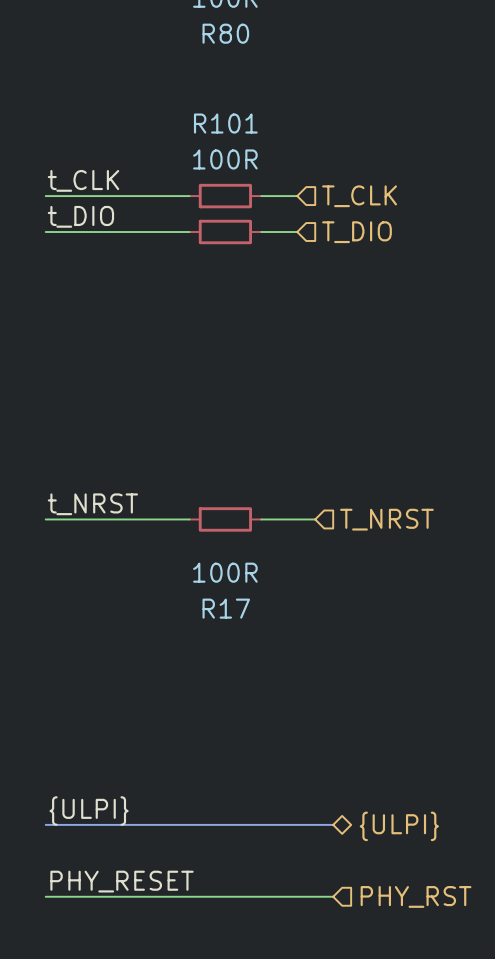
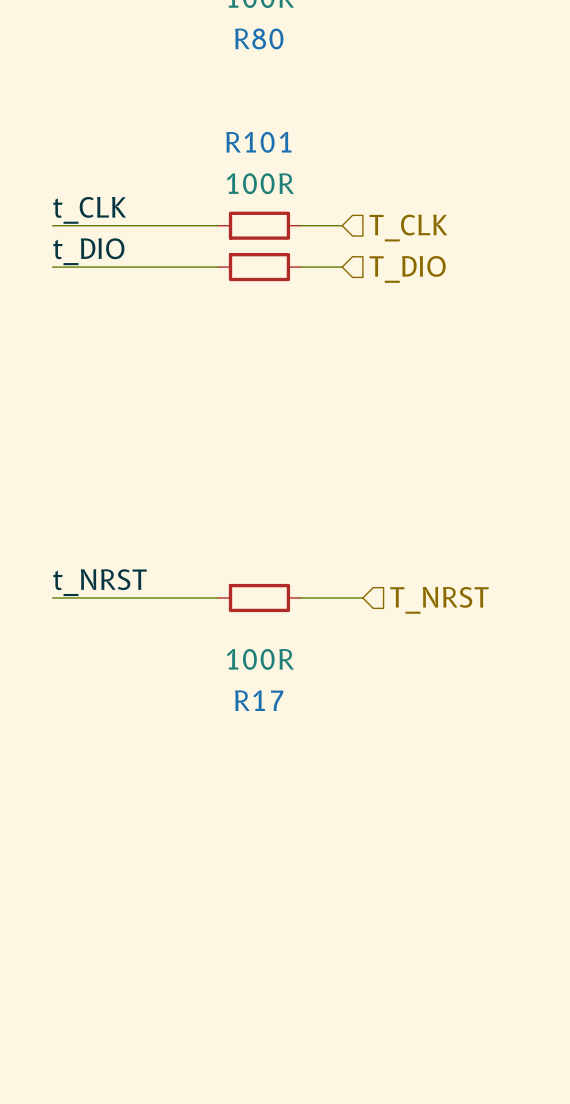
label: {ULPI} (89, 811) -> none
bus: (45, 824) (333, 824) -> none
hierarchical label: {ULPI} (399, 826) -> none
label: PHY_RESET (122, 881) -> none
wire: (45, 896) (333, 896) -> none
hierarchical label: PHY_RST (416, 896) -> none

